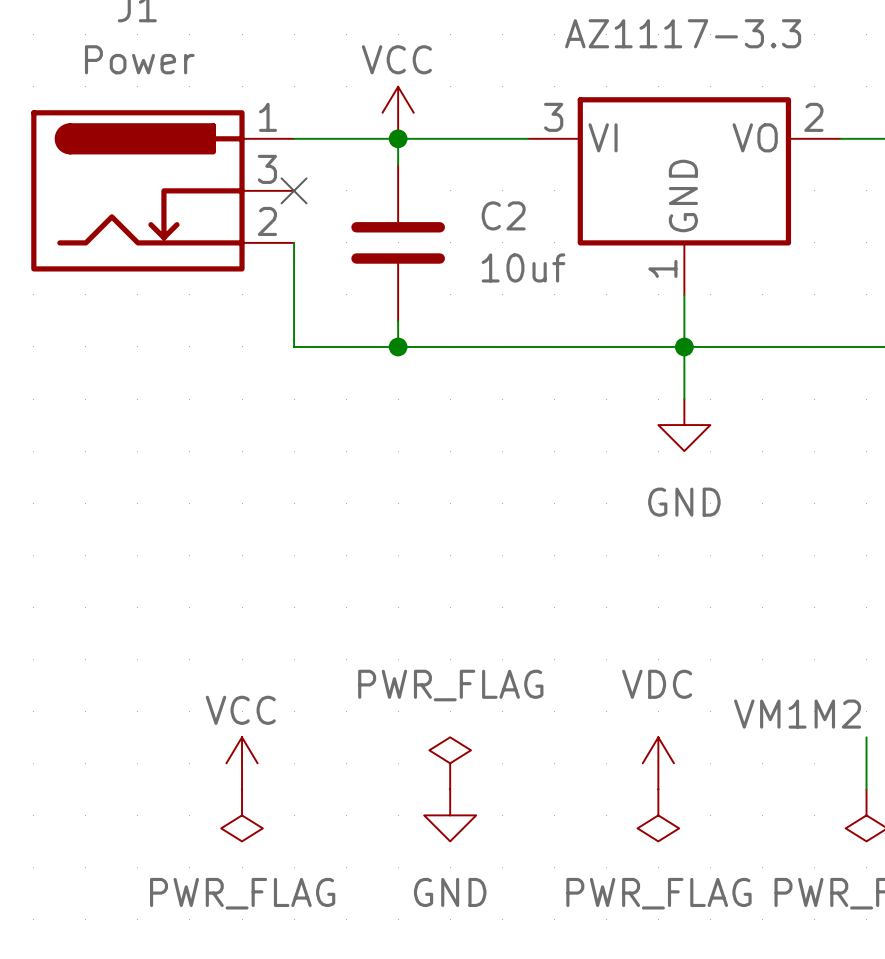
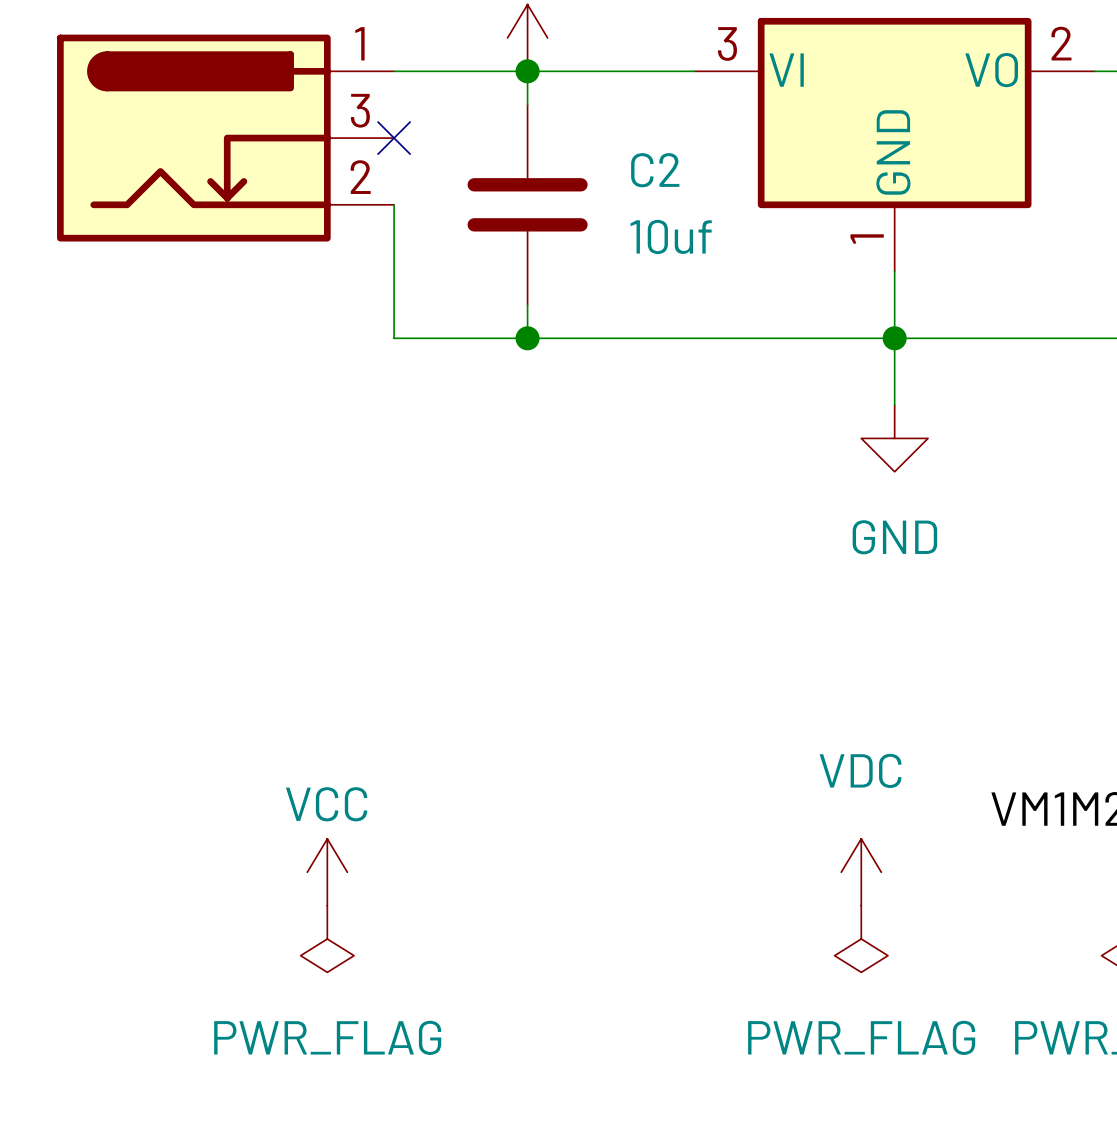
power symbol: PWR_FLAG (450, 763) -> none
power symbol: GND (450, 815) -> none

